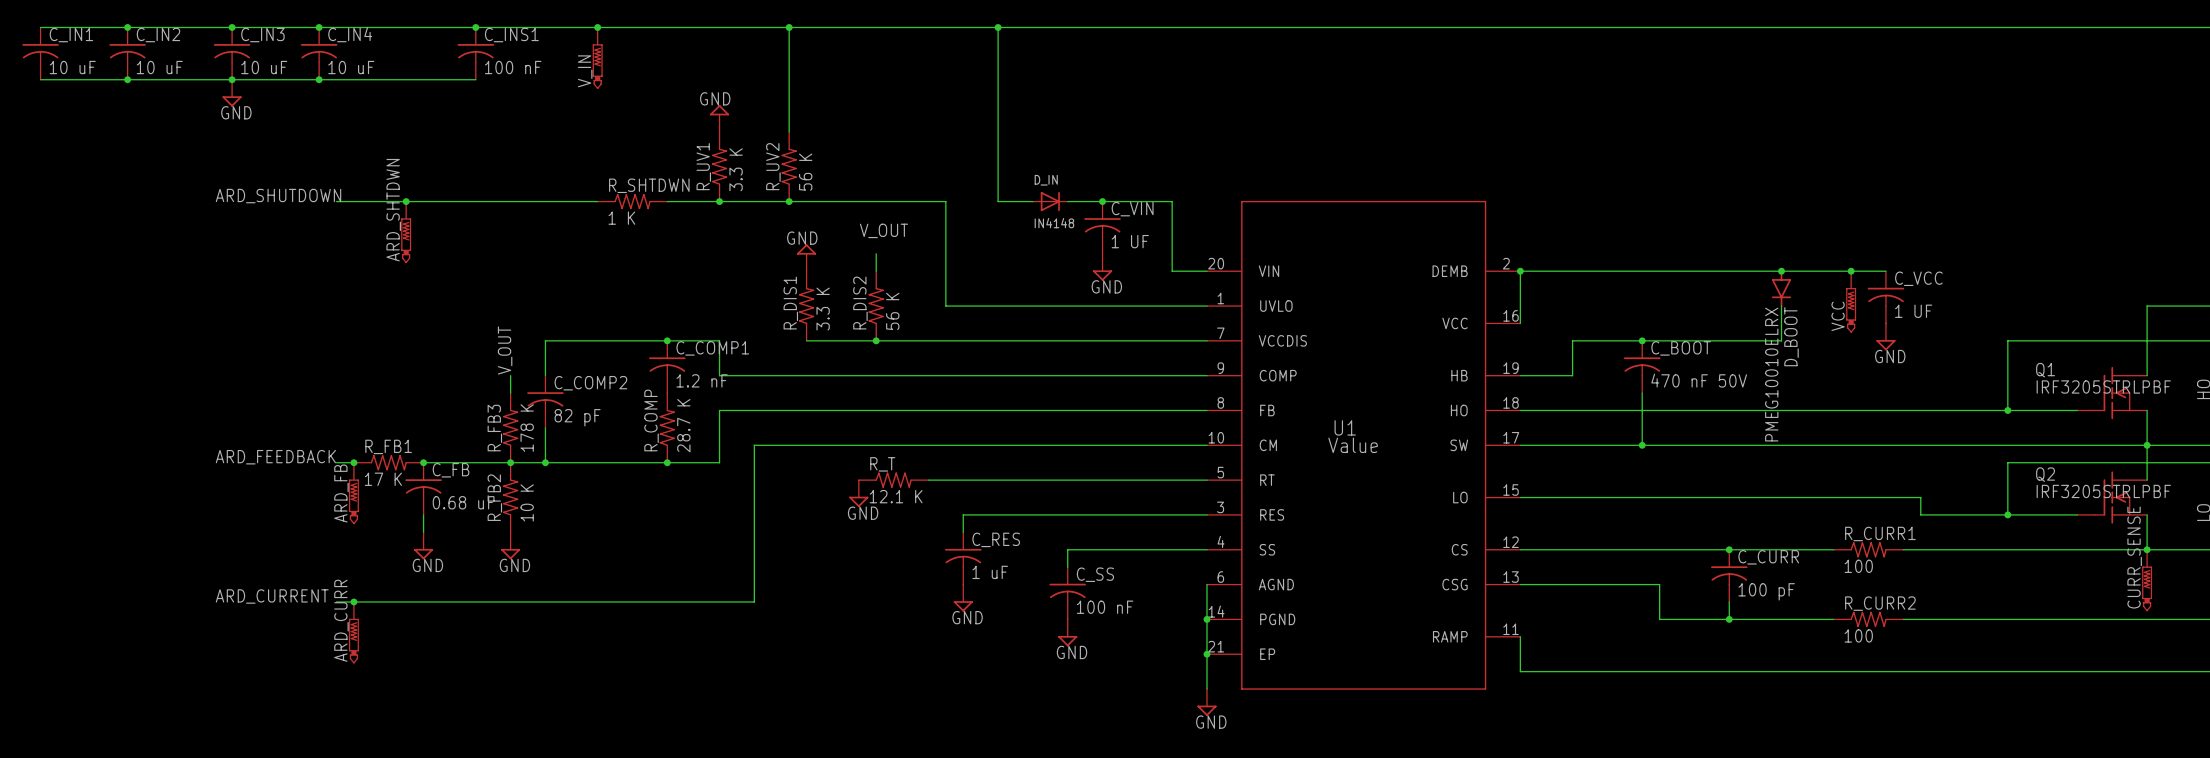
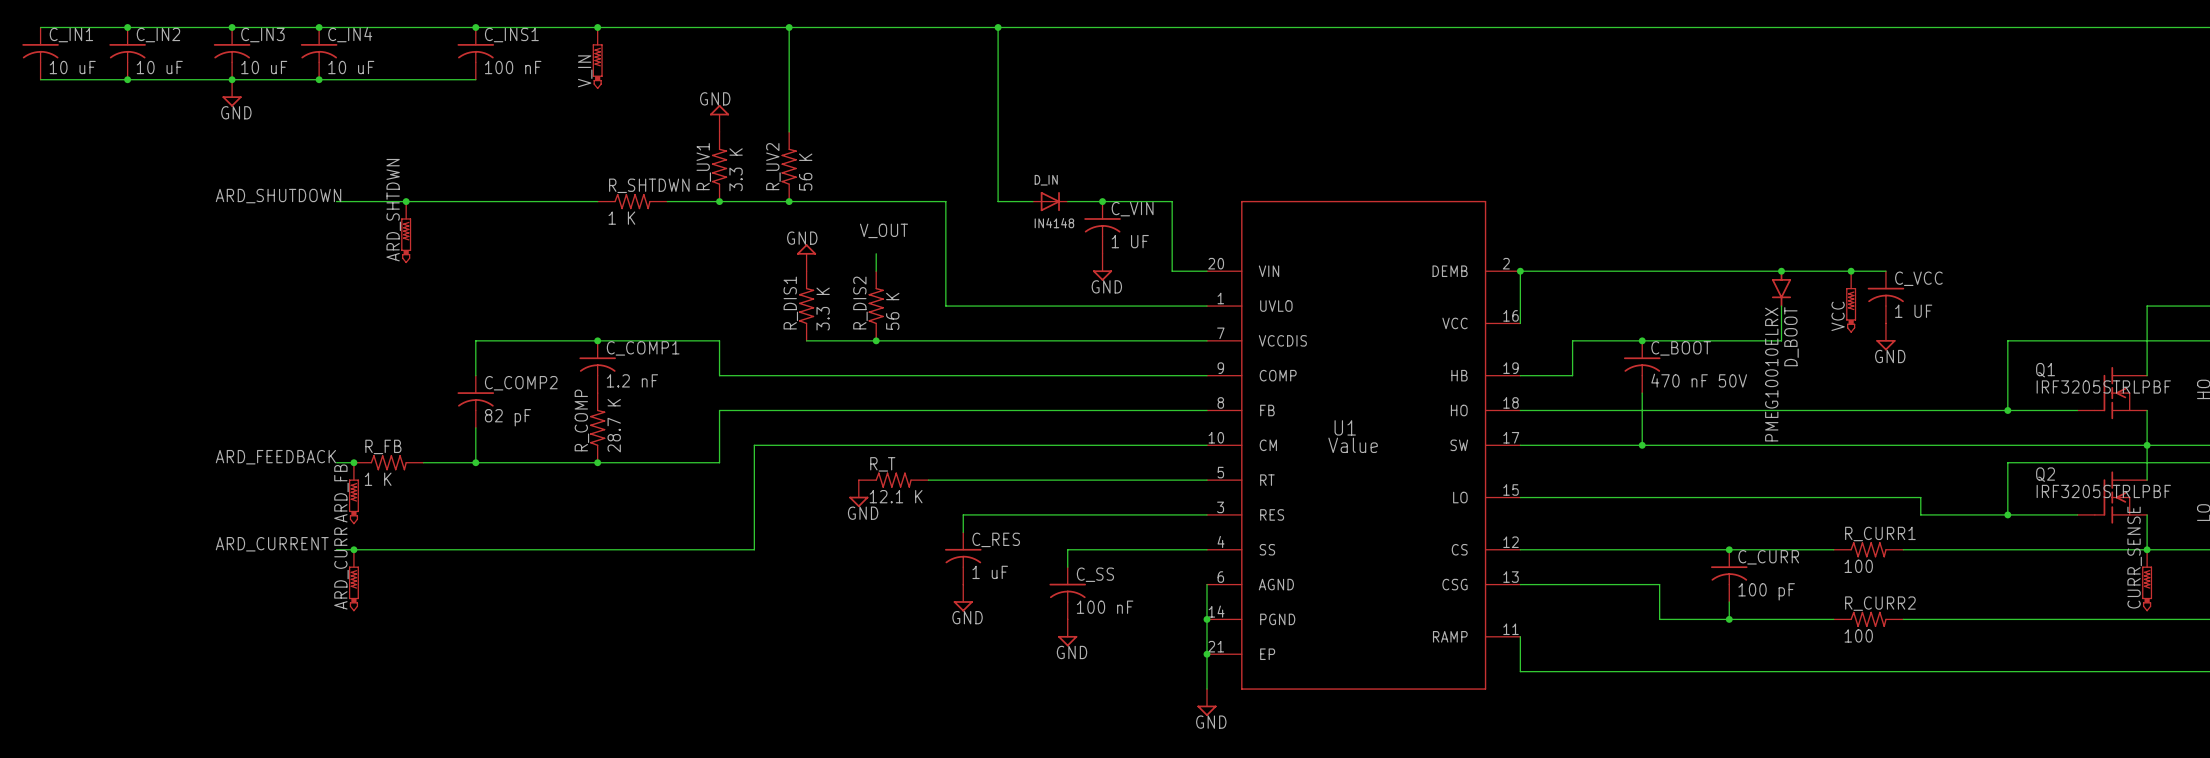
wire: (545, 340) (545, 375) -> (545, 340) (475, 340) (475, 375)
junction: none -> (597, 340)
junction: (667, 340) -> none
label: V_OUT (505, 350) -> none
C_COMP1 position: (667, 366) -> (597, 366)
wire: (510, 375) (510, 393) -> none
C_COMP2 position: (545, 401) -> (475, 401)
R_FB3: 178 K (510, 427) -> none
wire: (545, 427) (545, 462) -> (475, 427) (475, 462)
R_COMP position: (667, 427) -> (597, 427)
R_FB1 name: R_FB1 (388, 446) -> R_FB (383, 446)
junction: (423, 462) -> none
junction: none -> (475, 462)
junction: (510, 462) -> none
junction: (545, 462) -> none
junction: none -> (597, 462)
junction: (667, 462) -> none
R_FB1 value: 17 K (383, 479) -> 1 K (378, 479)
C_FB: 0.68 uF (423, 488) -> none
R_FB2: 10 K (510, 497) -> none
wire: (423, 514) (423, 532) -> none
power symbol: GND (423, 545) -> none
power symbol: GND (510, 545) -> none
junction: none -> (353, 549)
wire: (754, 549) (754, 601) (336, 601) -> (754, 549) (336, 549)
label position: ARD_CURRENT (272, 596) -> ARD_CURRENT (272, 544)
junction: (353, 601) -> none
ARD_CURR position: (353, 632) -> (353, 580)

